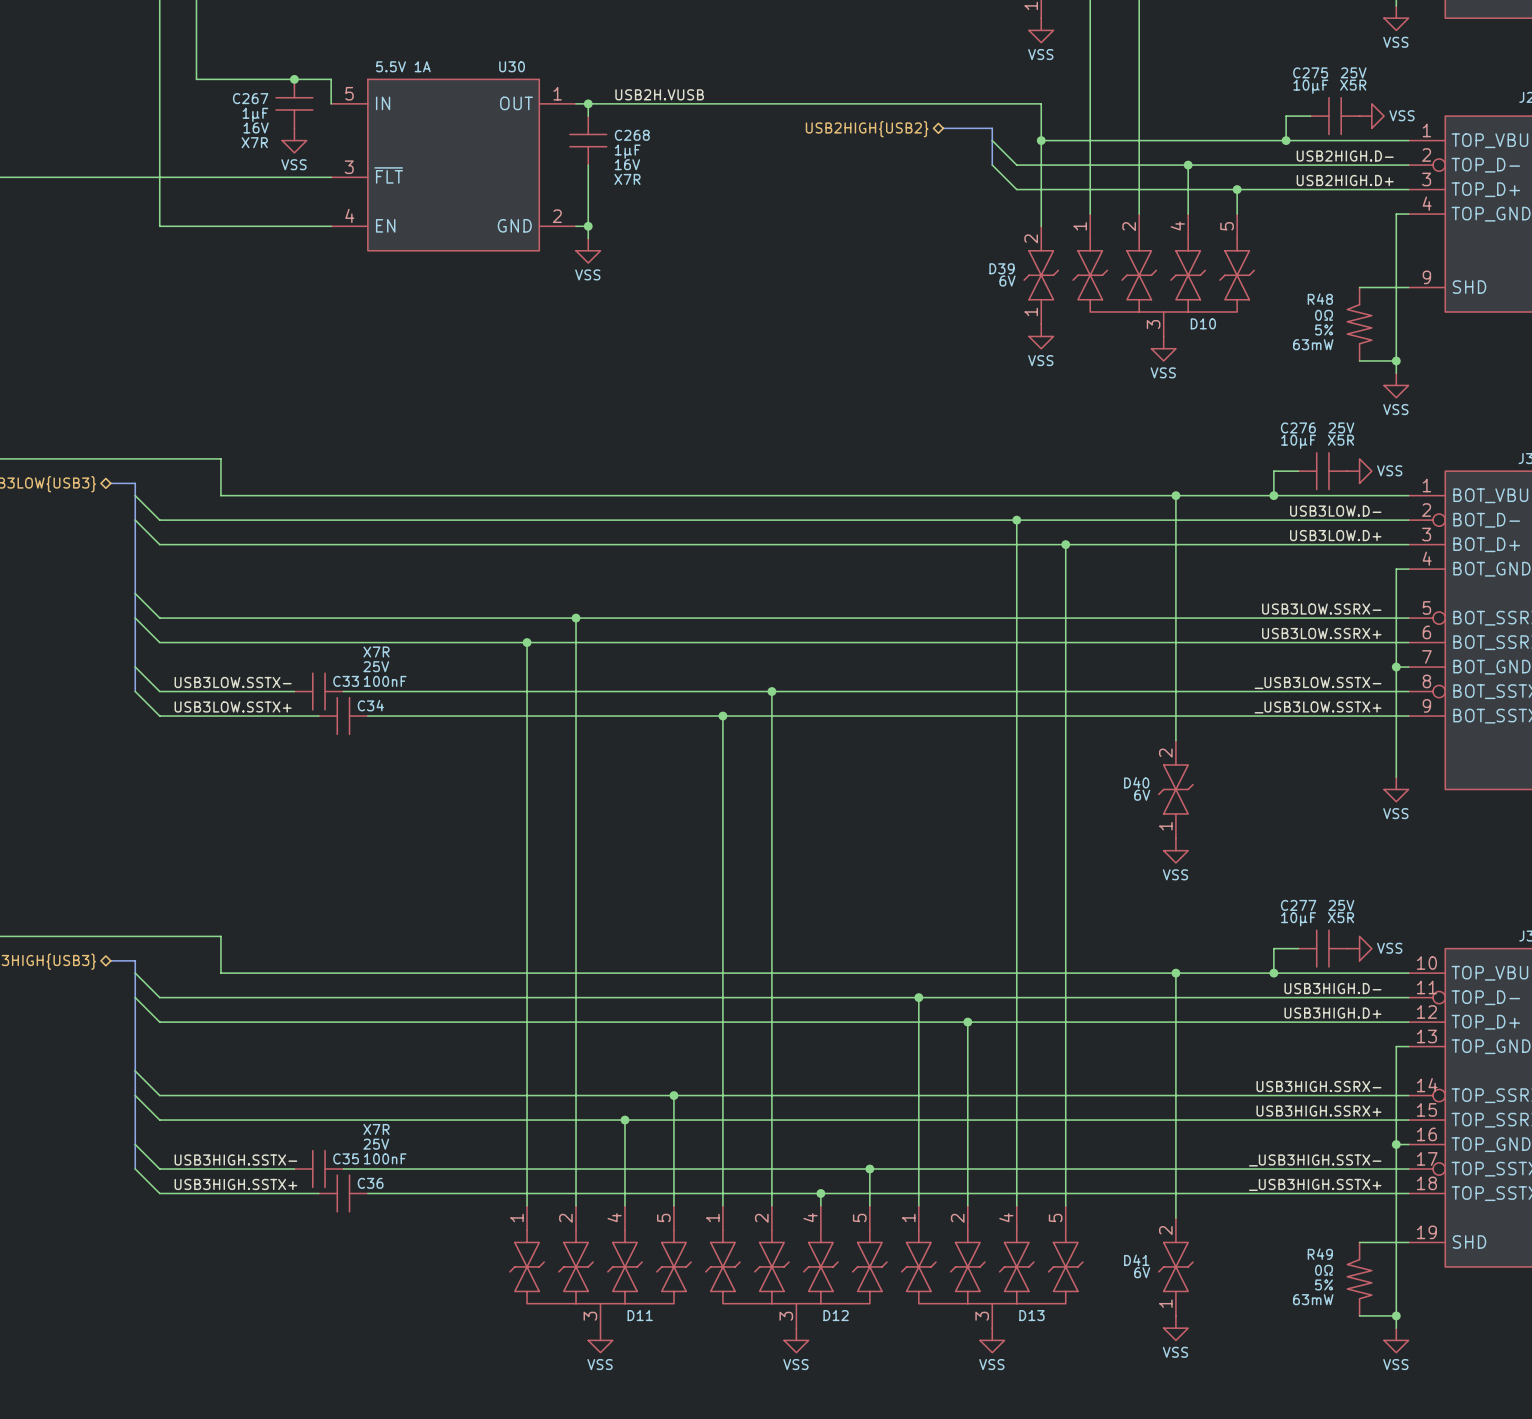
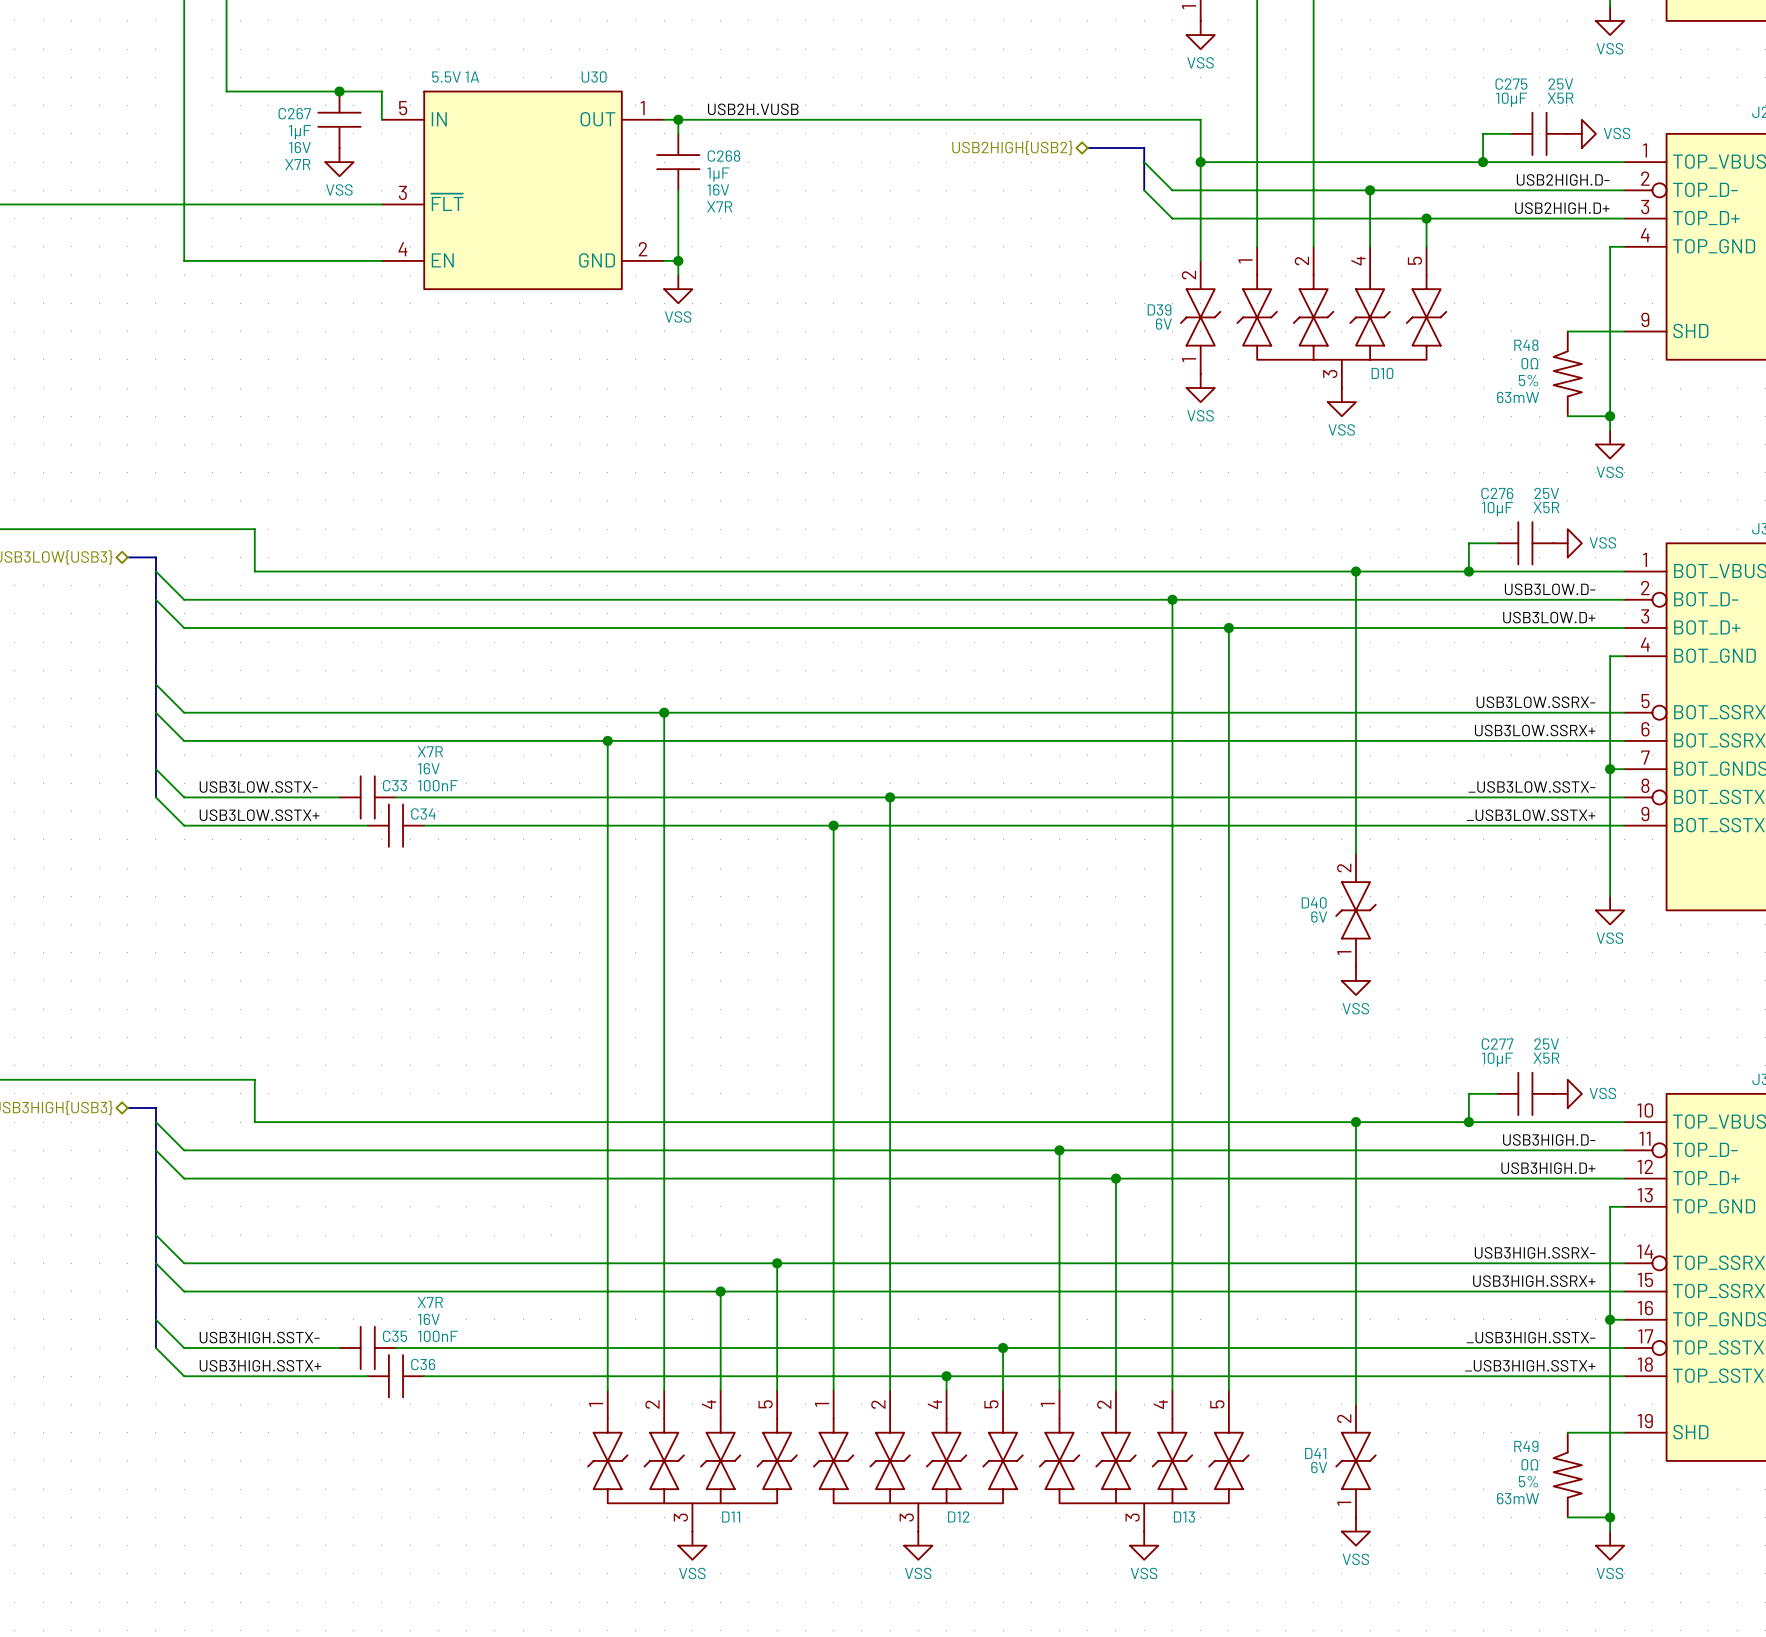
C33 text: 25V (376, 666) -> 16V (428, 768)
C35 text: 25V (376, 1144) -> 16V (428, 1319)

